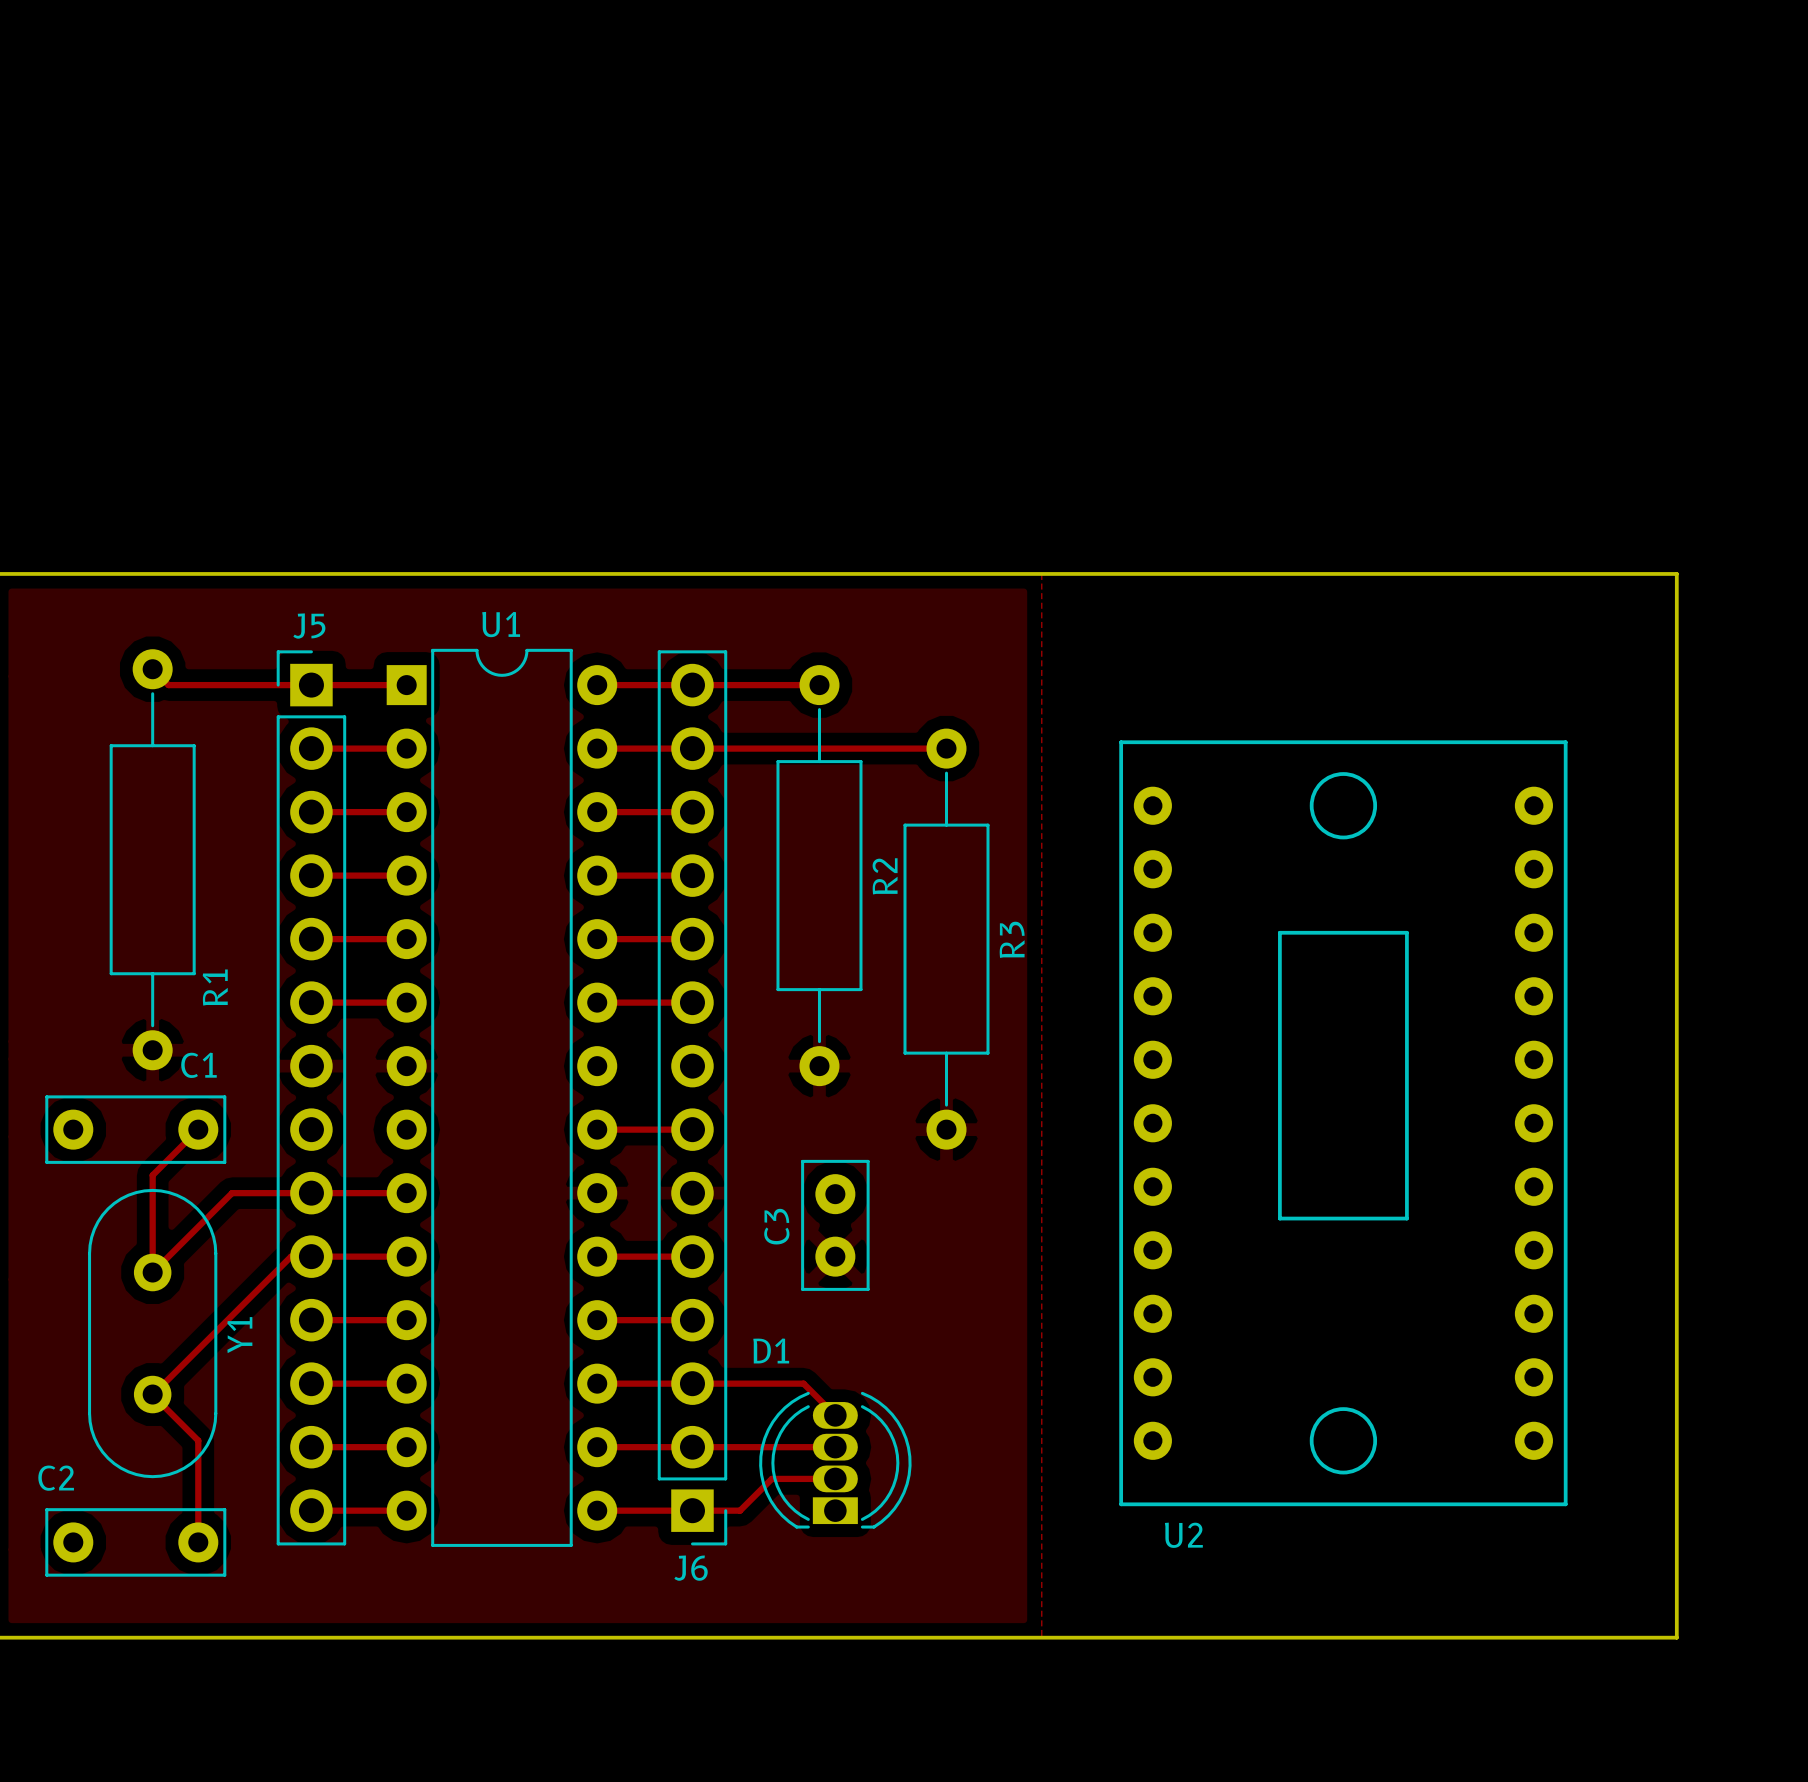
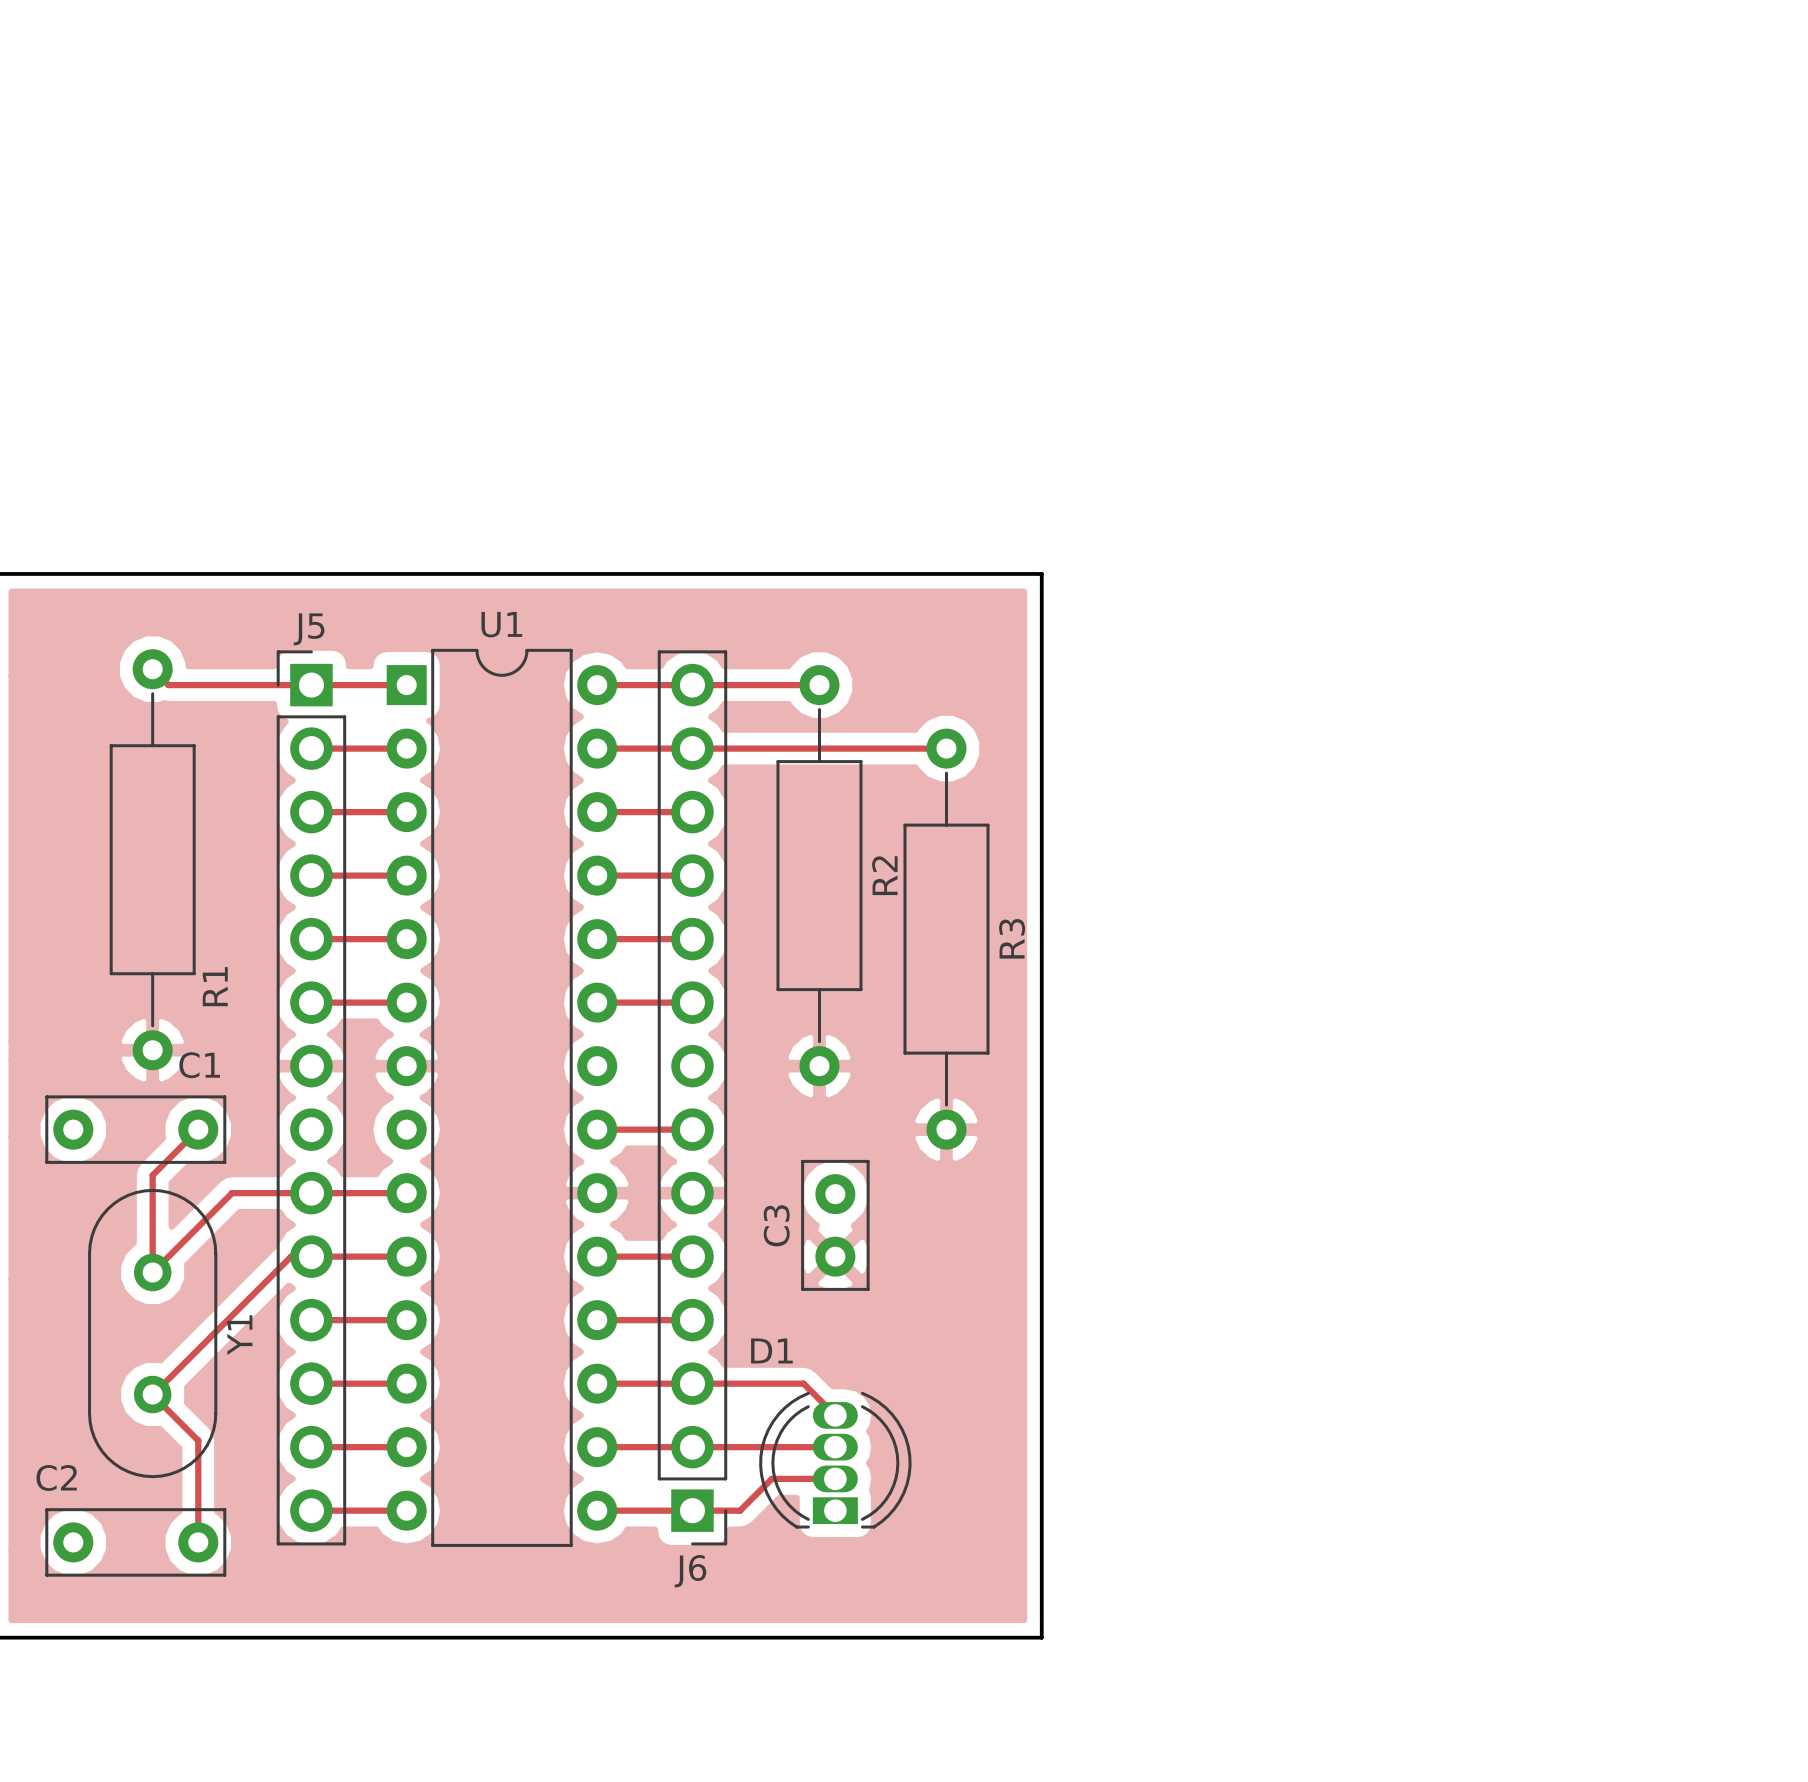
board edge: (1041, 573) (1676, 573) (1676, 1637) (1041, 1637) -> (1041, 573) (1041, 1637)
U2: (1343, 1123) -> none

